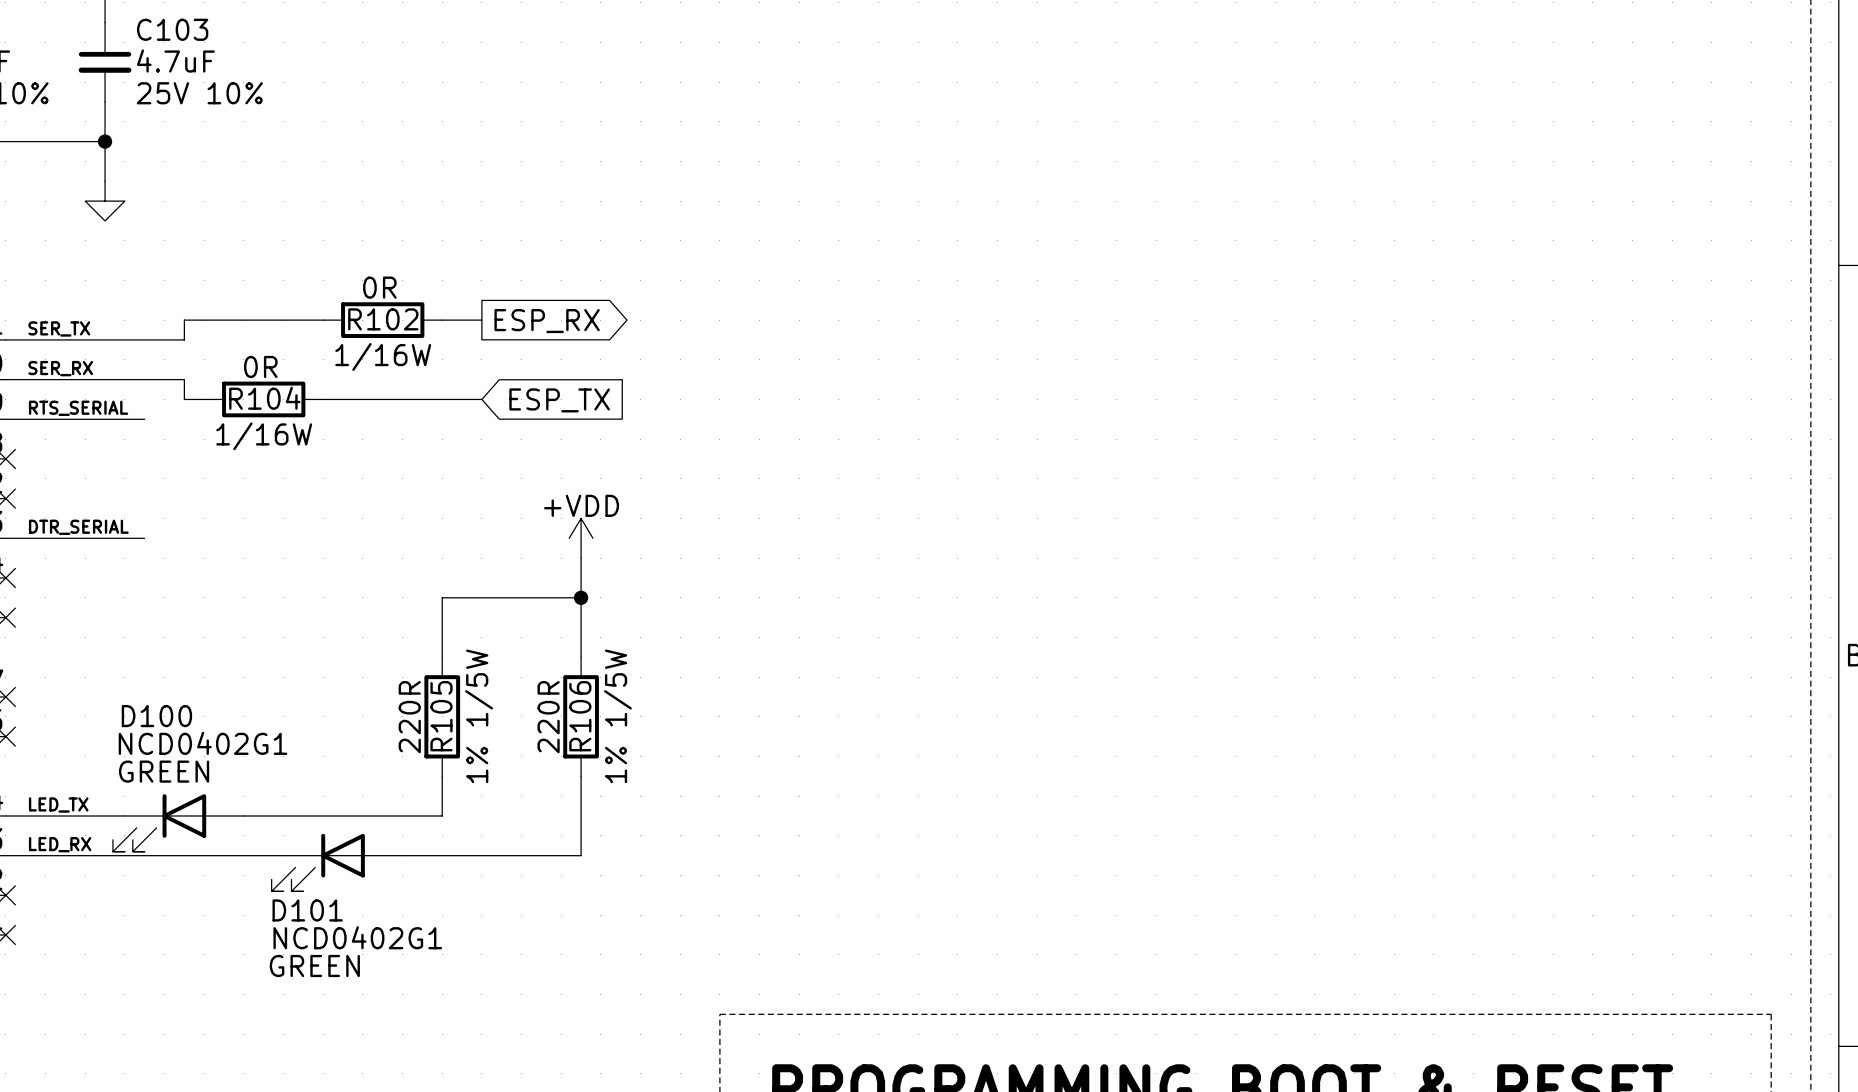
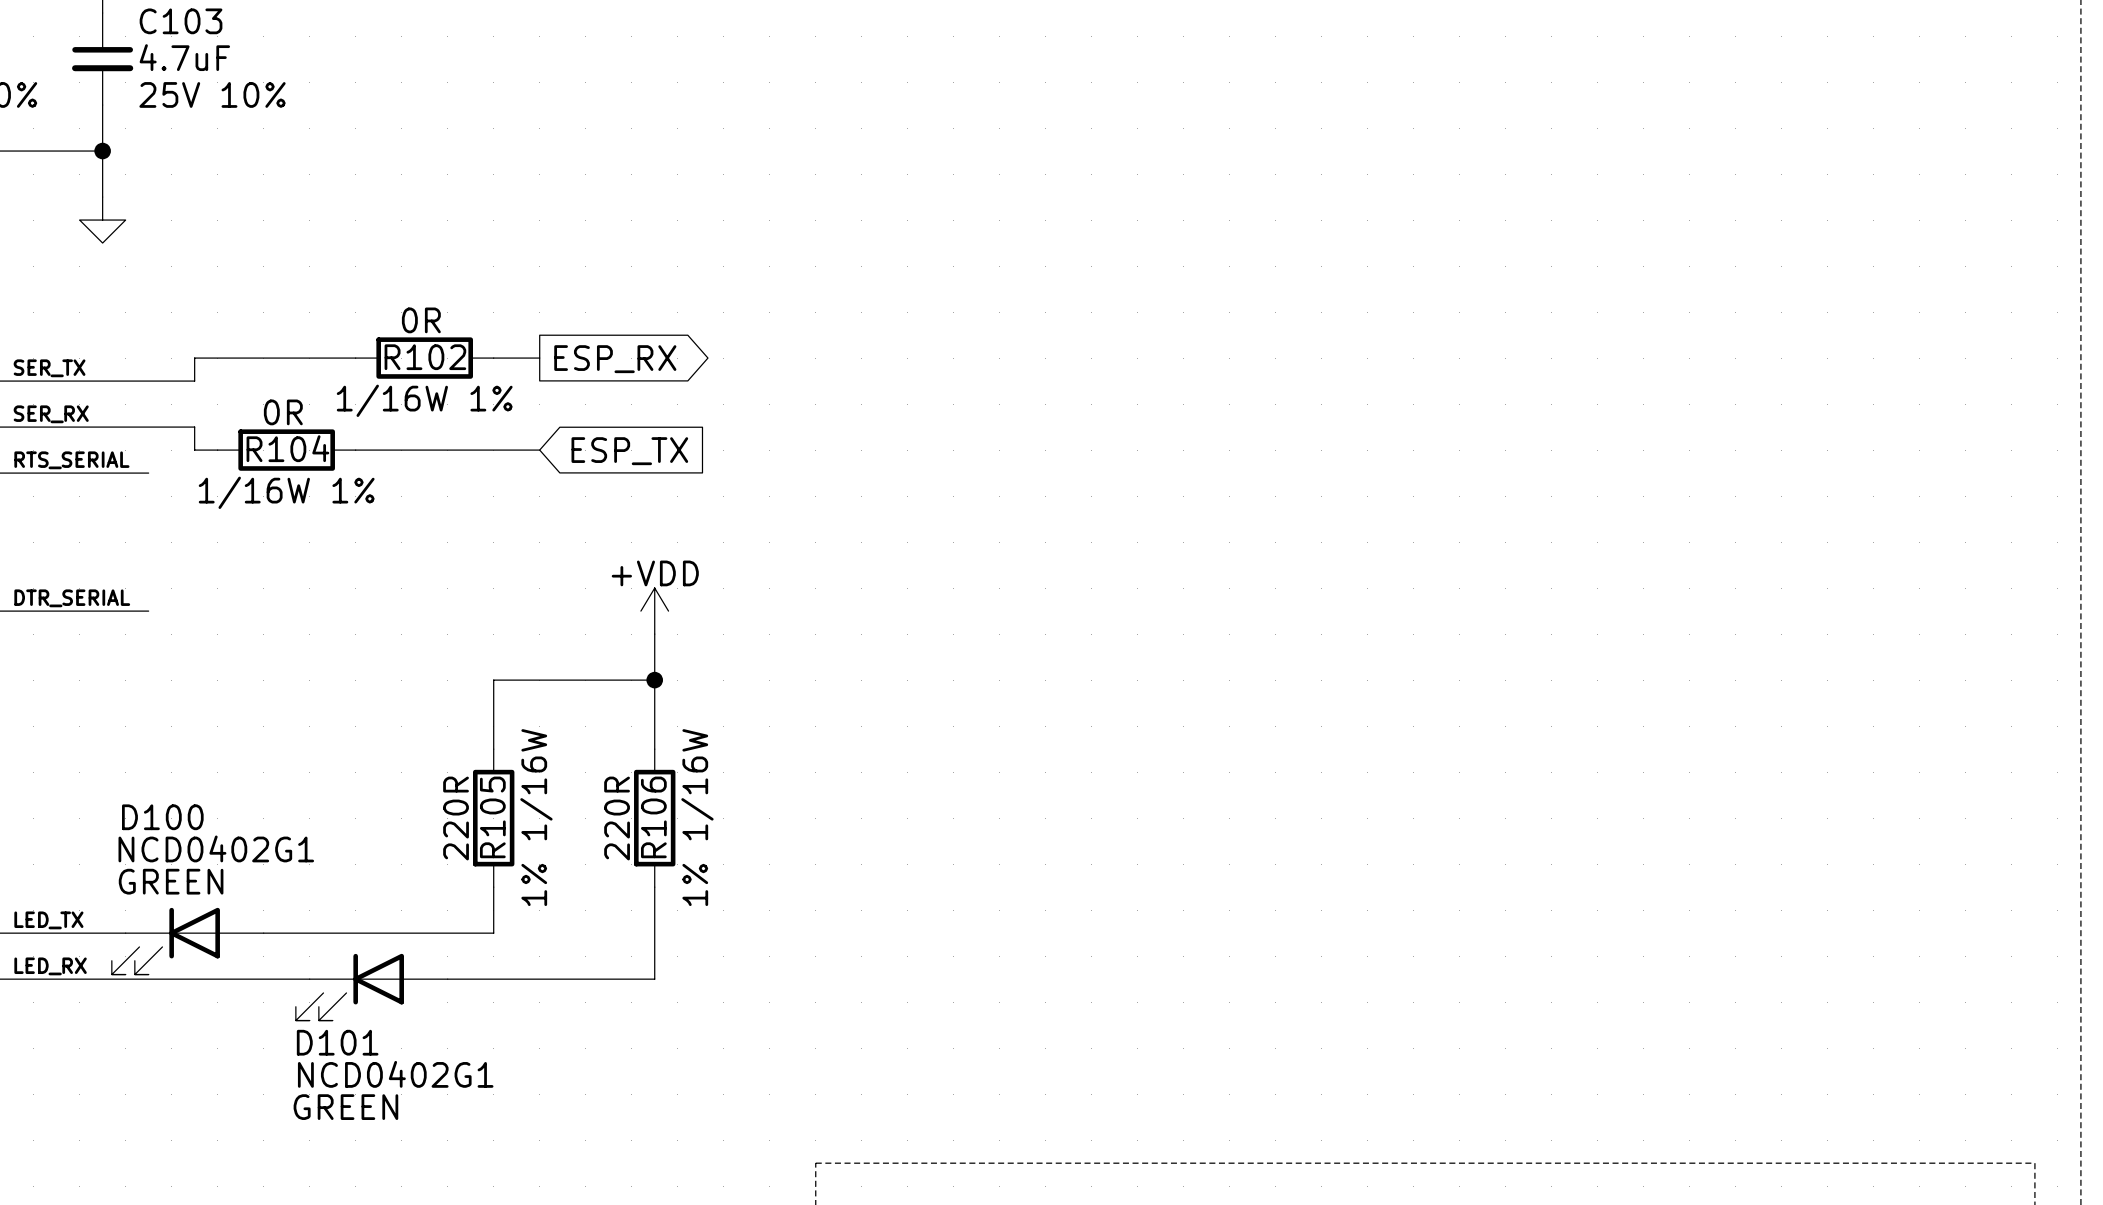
R102 text: 1/16W (383, 356) -> 1/16W 1% (424, 400)
R104 text: 1/16W (264, 436) -> 1/16W 1% (286, 492)
R105 text: 1% 1/5W (479, 716) -> 1% 1/16W (536, 817)
R106 text: 1% 1/5W (617, 716) -> 1% 1/16W (697, 817)

